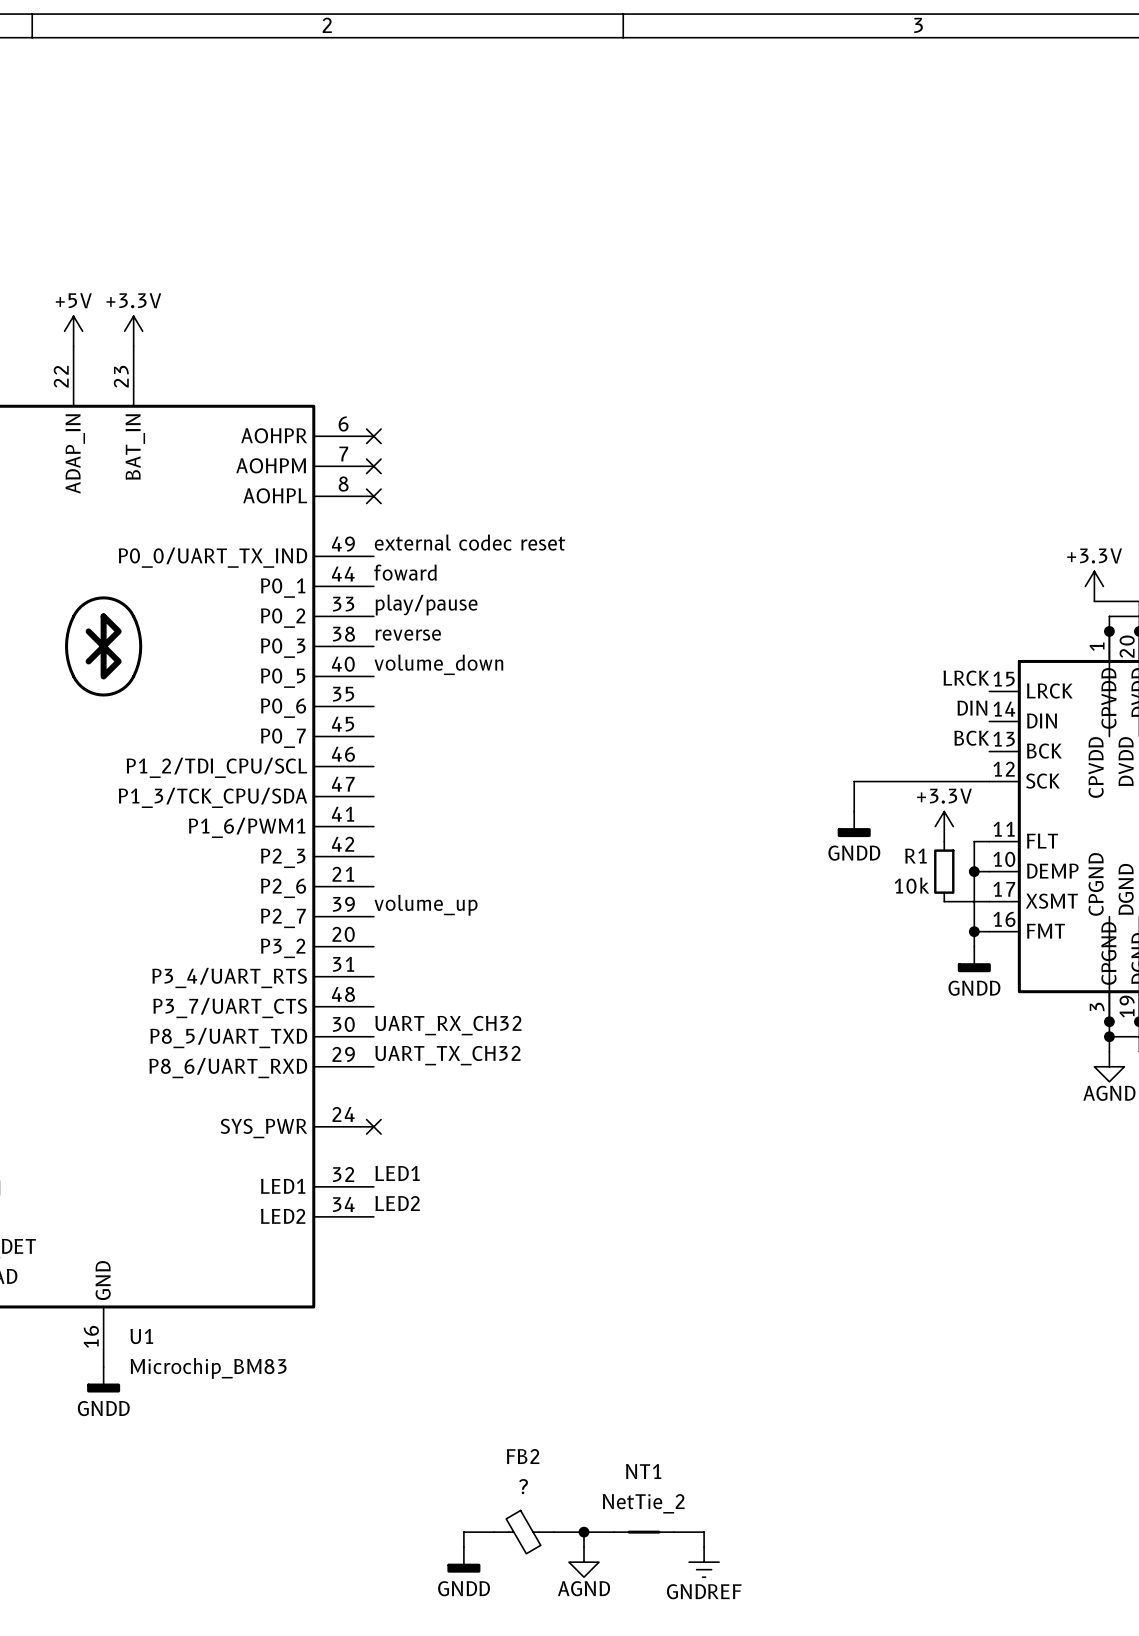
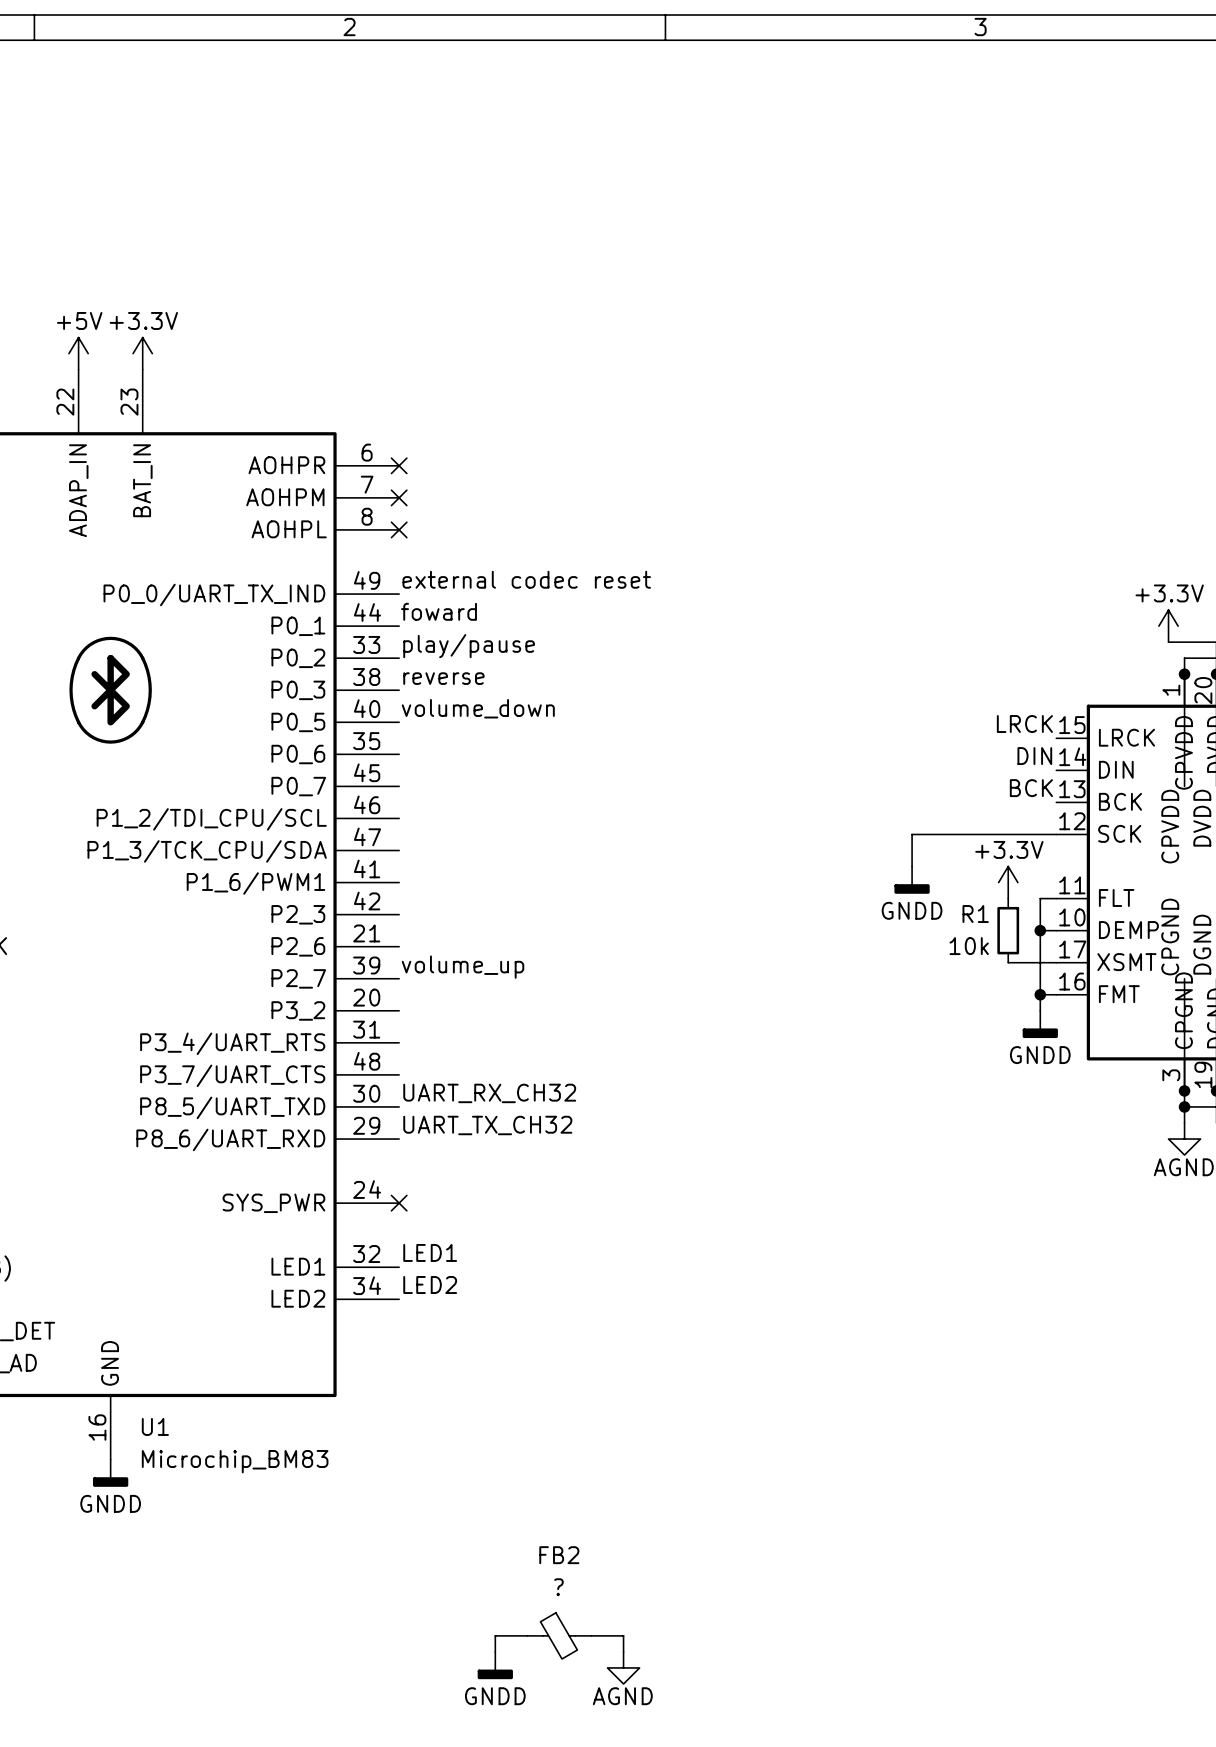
wire: (584, 1532) (614, 1532) -> none
junction: (584, 1532) -> none
NT1: NetTie_2 (644, 1532) -> none
wire: (674, 1532) (704, 1532) (704, 1547) -> none
power symbol: GNDREF (704, 1562) -> none

